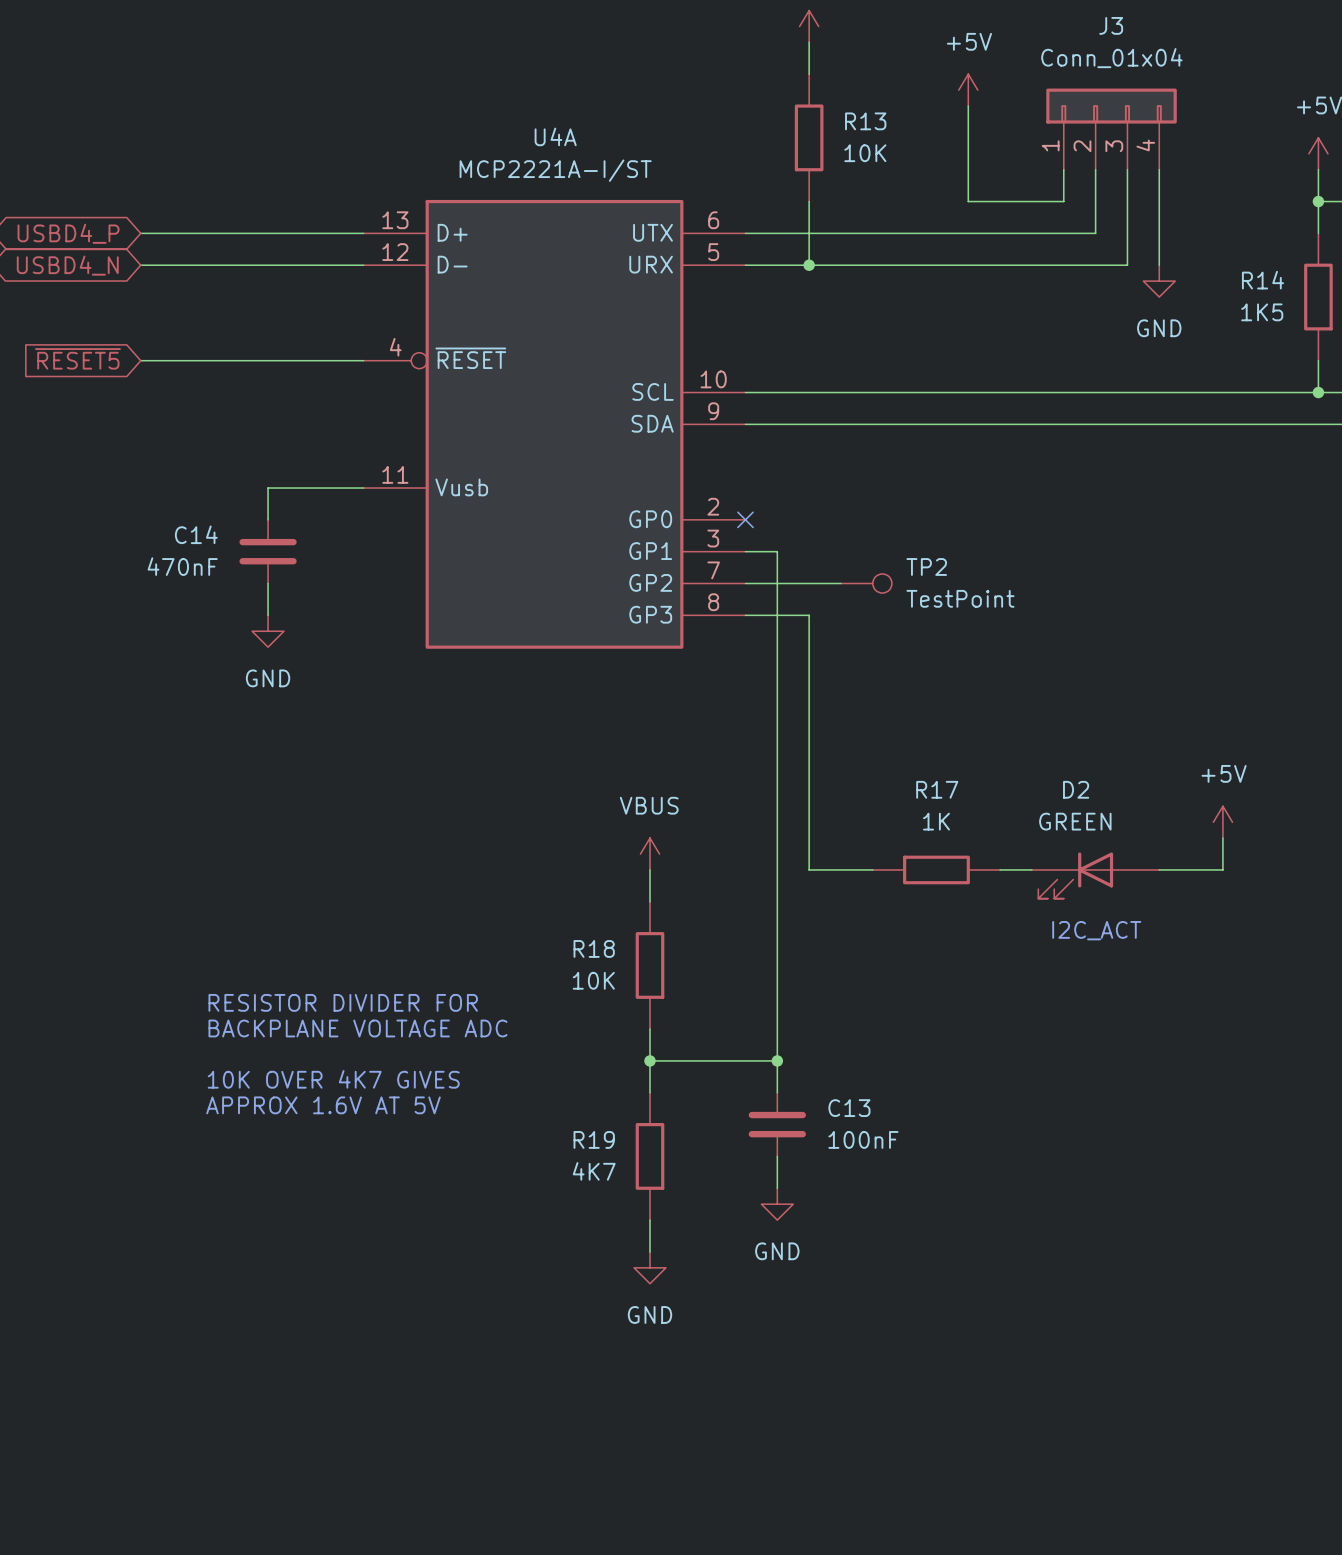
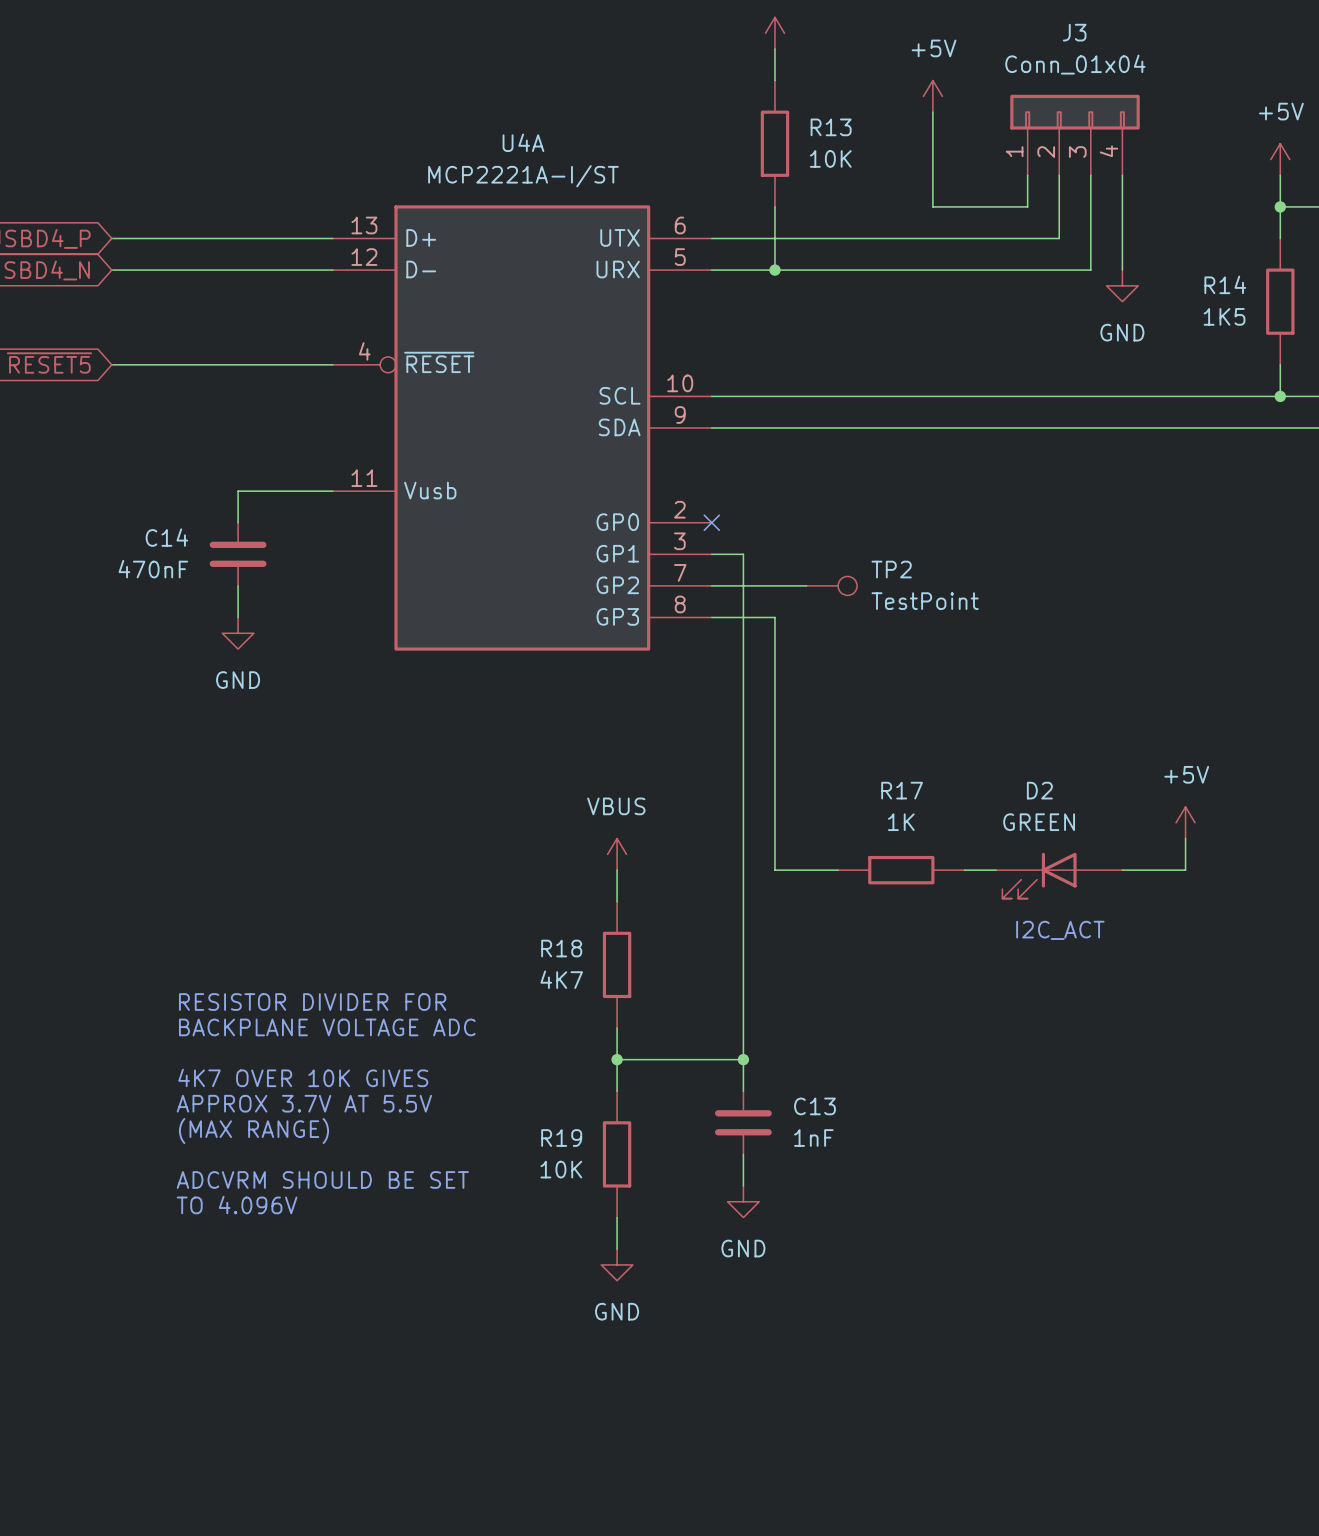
R18 value: 10K (593, 980) -> 4K7 (561, 979)
text: 10K OVER 4K7 GIVES (333, 1079) -> 4K7 OVER 10K GIVES (303, 1077)
text: APPROX 1.6V AT 5V (323, 1105) -> APPROX 3.7V AT 5.5V (304, 1103)
text: none -> (MAX RANGE) (253, 1131)
C13 value: 100nF (863, 1139) -> 1nF (813, 1138)
R19 value: 4K7 (594, 1171) -> 10K (561, 1169)
text: none -> ADCVRM SHOULD BE SET (322, 1179)
text: none -> TO 4.096V (237, 1205)

